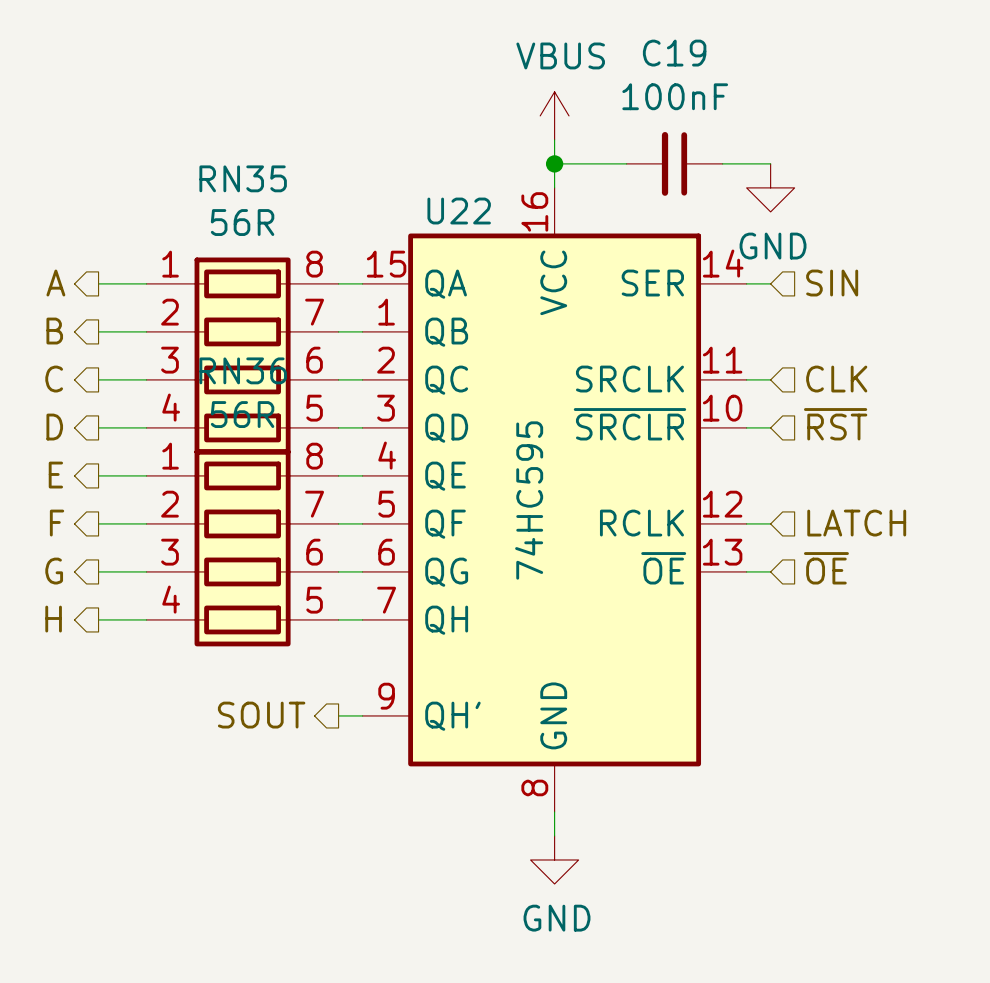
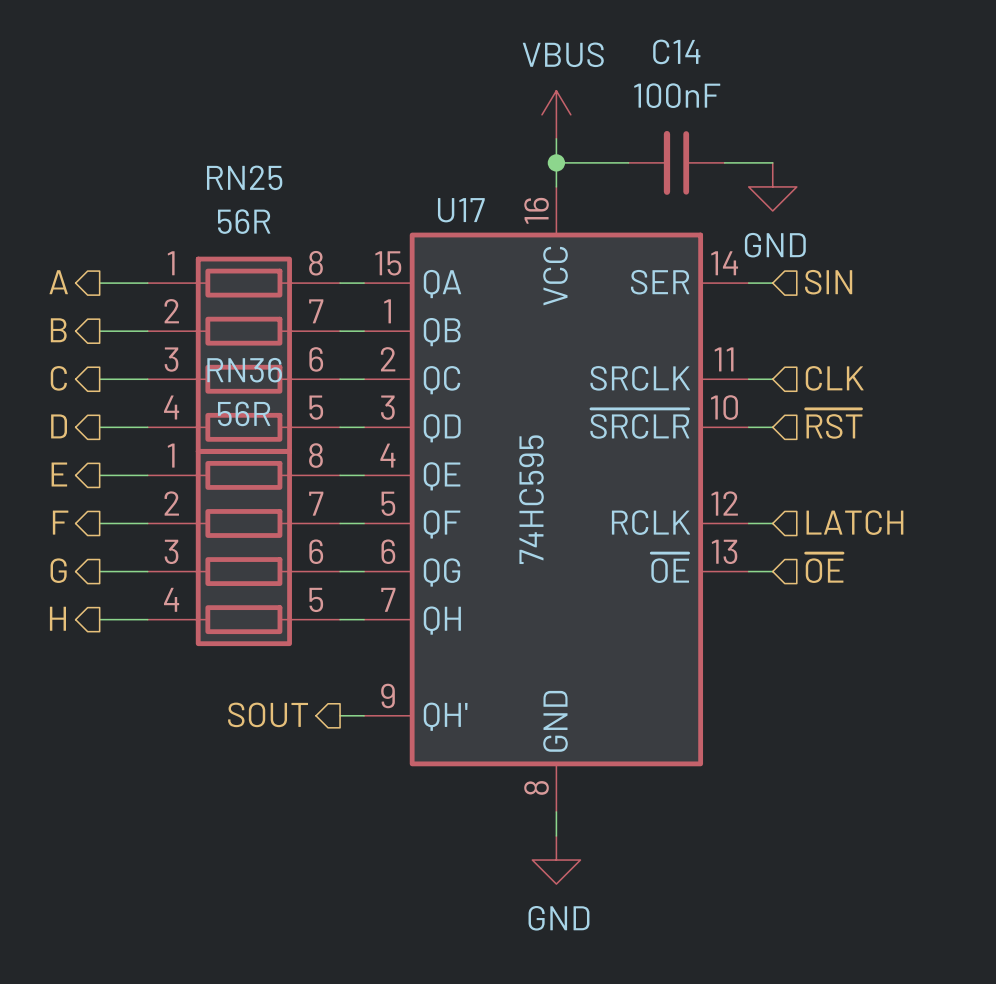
C19 name: C19 (674, 53) -> C14 (676, 51)
RN35 name: RN35 (243, 178) -> RN25 (244, 177)
U22 name: U22 (459, 211) -> U17 (461, 210)

